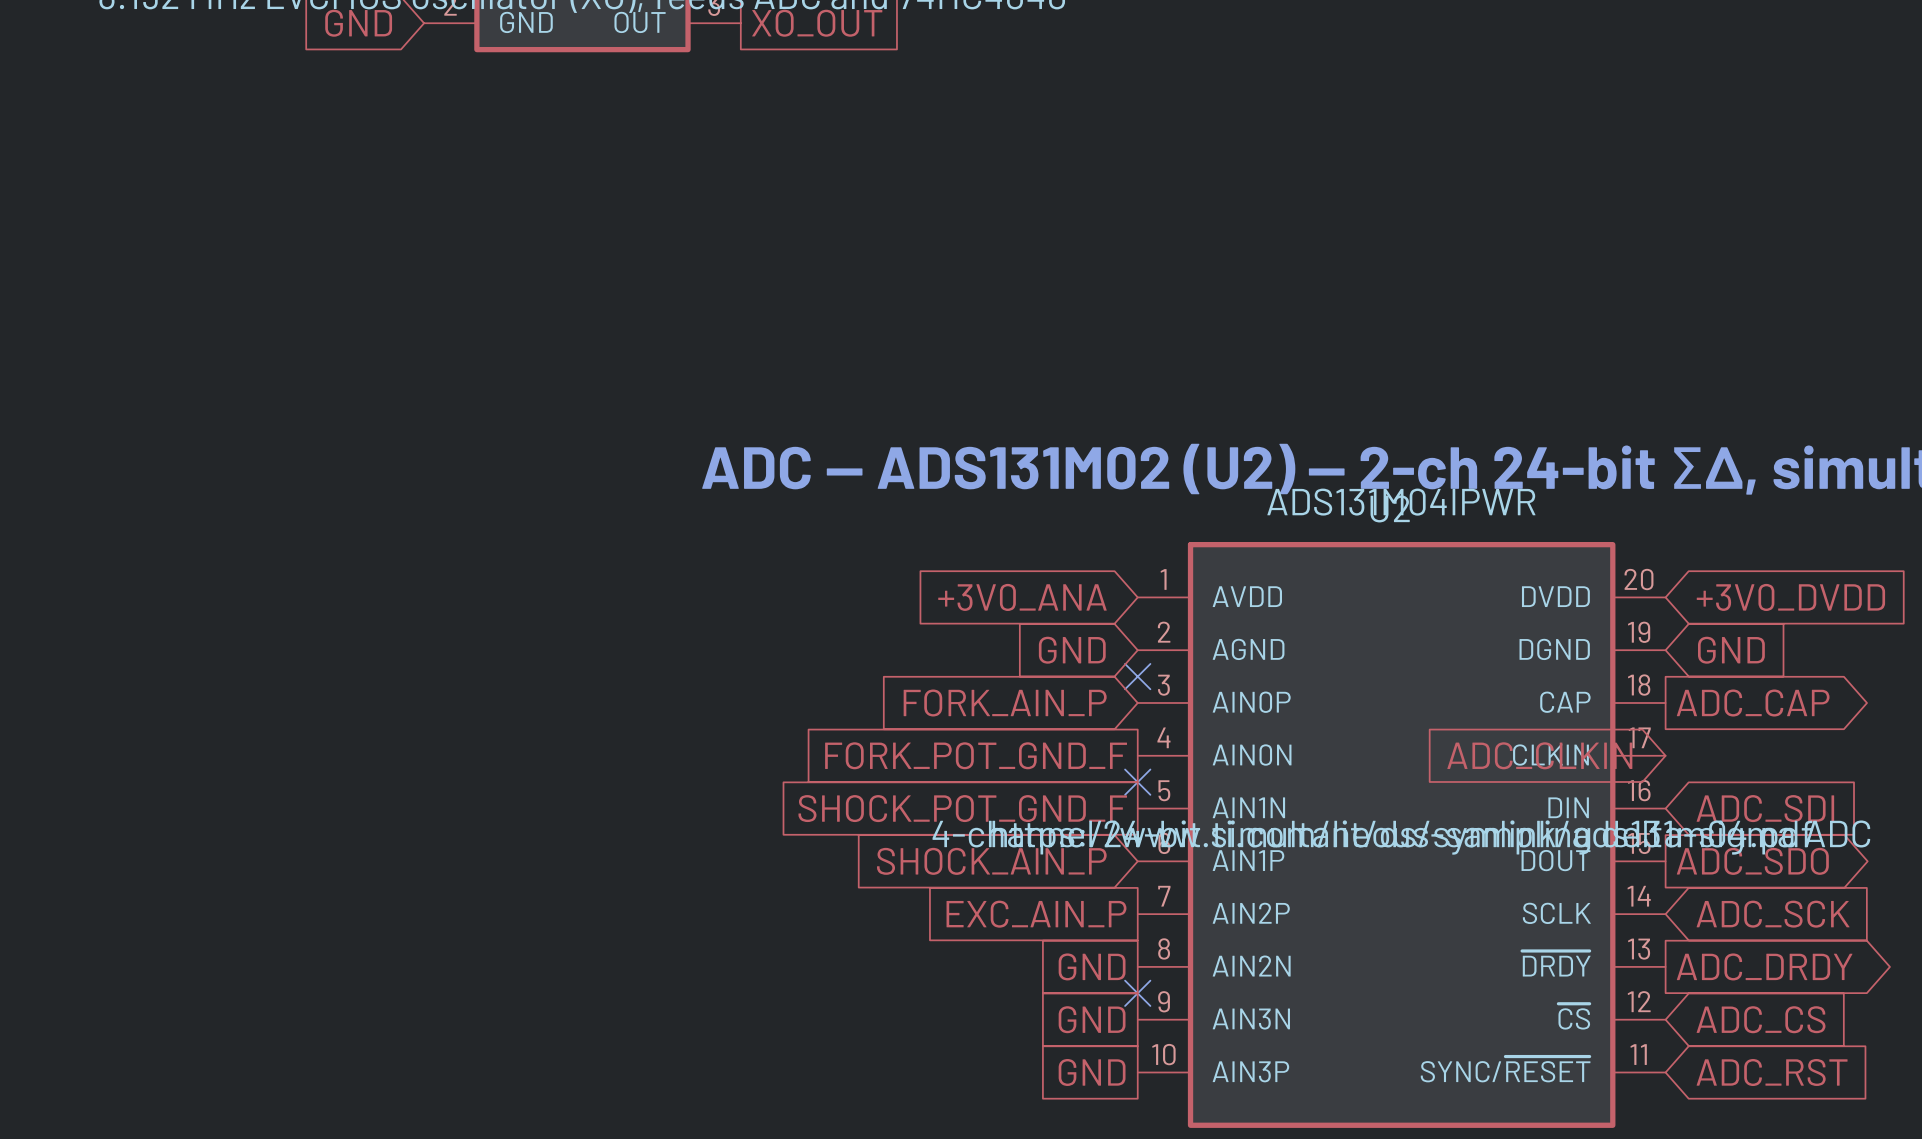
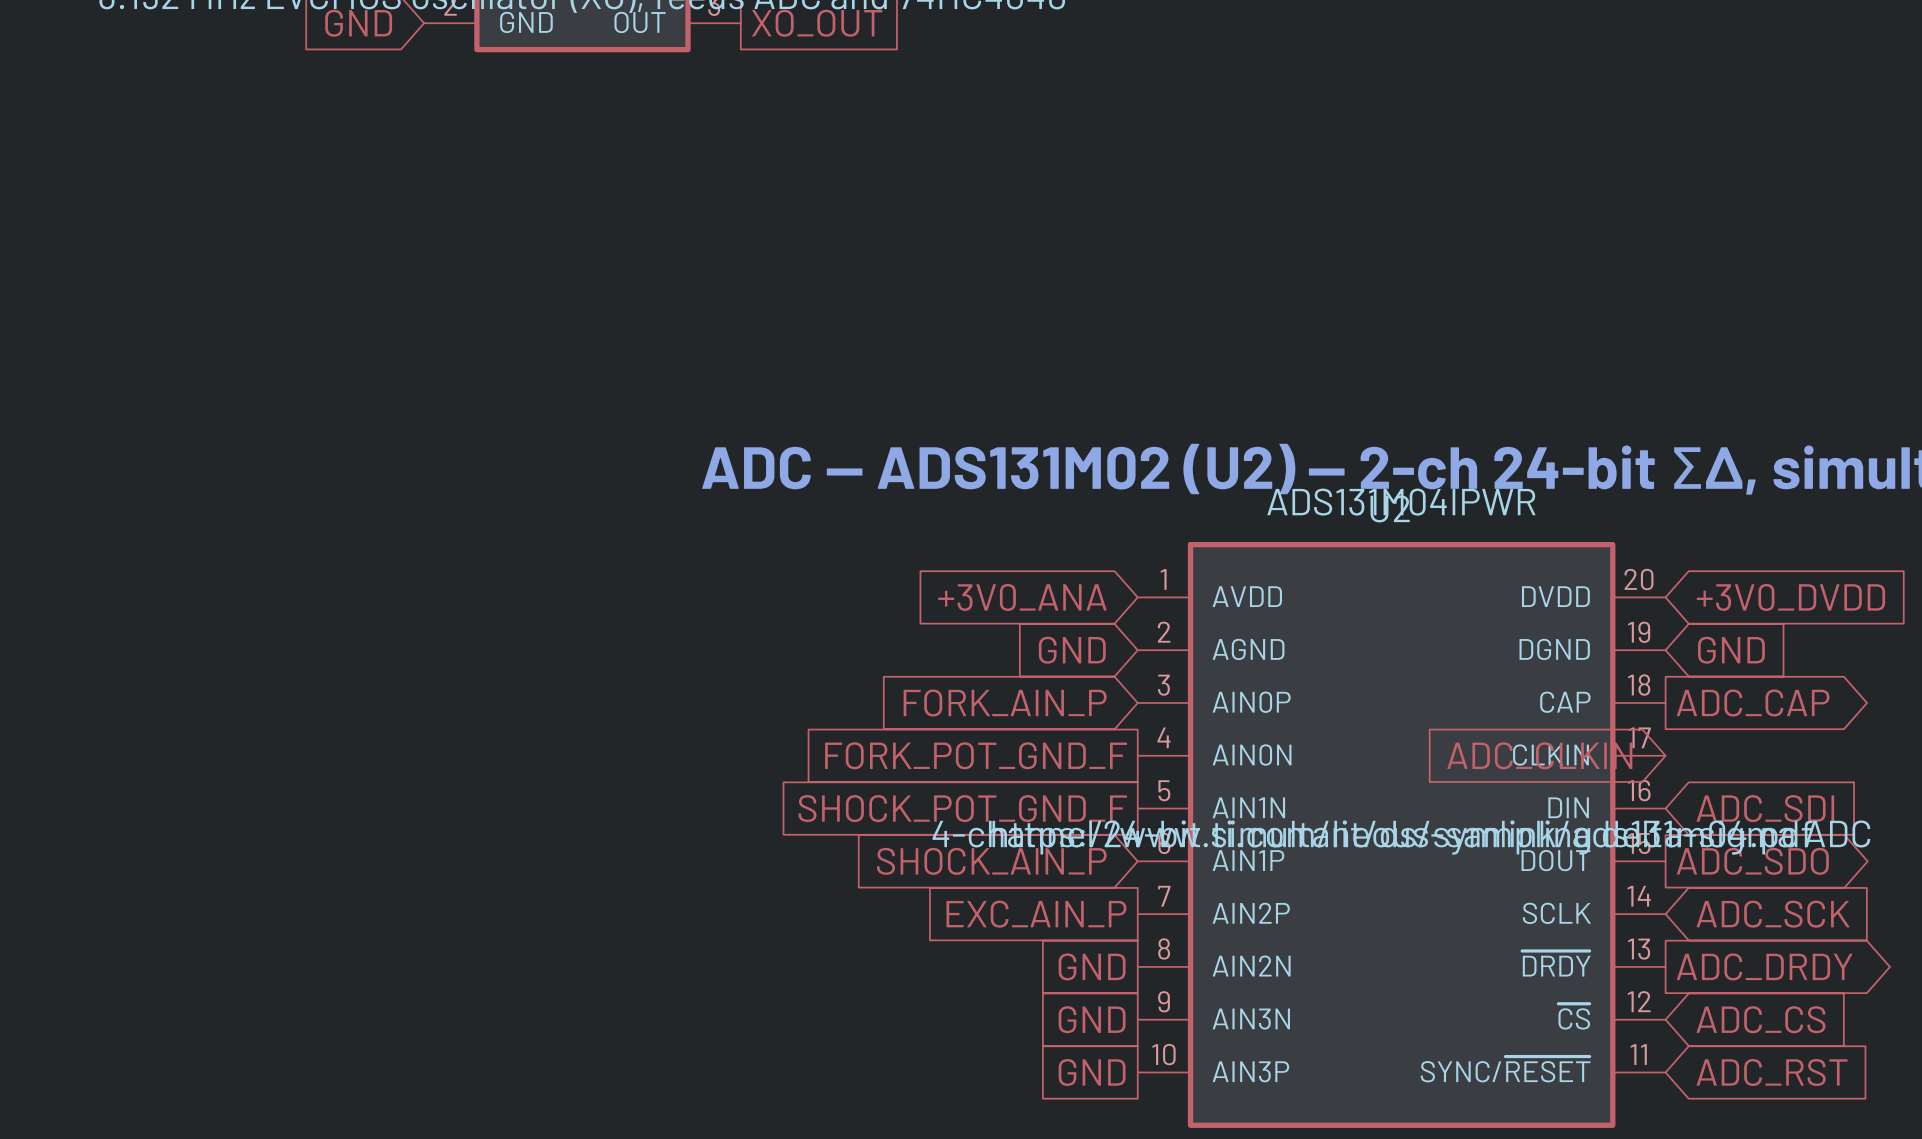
no-connect mark: (1137, 676) -> none
no-connect mark: (1137, 782) -> none
no-connect mark: (1137, 993) -> none

